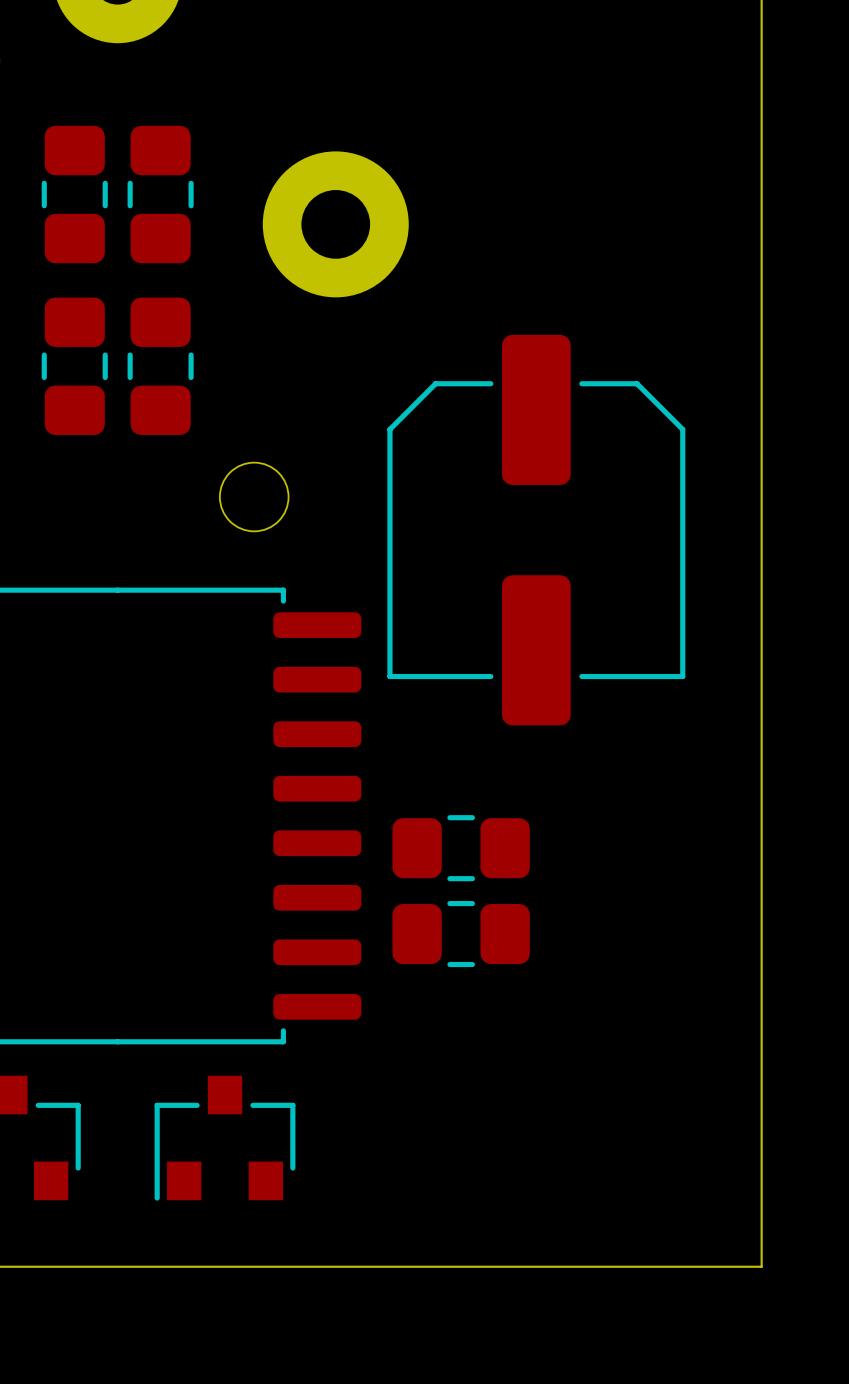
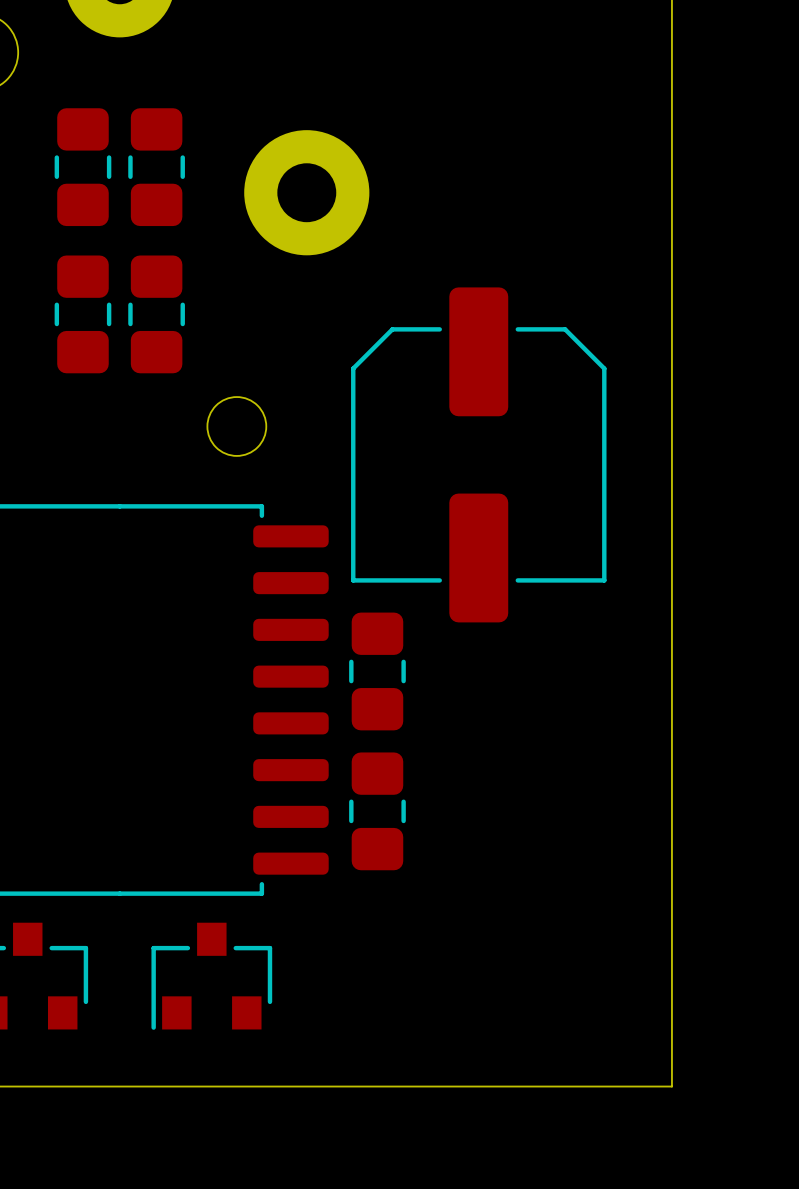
part: none -> (377, 671)
part: (461, 848) -> none
part rotation: 0° (461, 934) -> 90° clockwise (377, 811)

